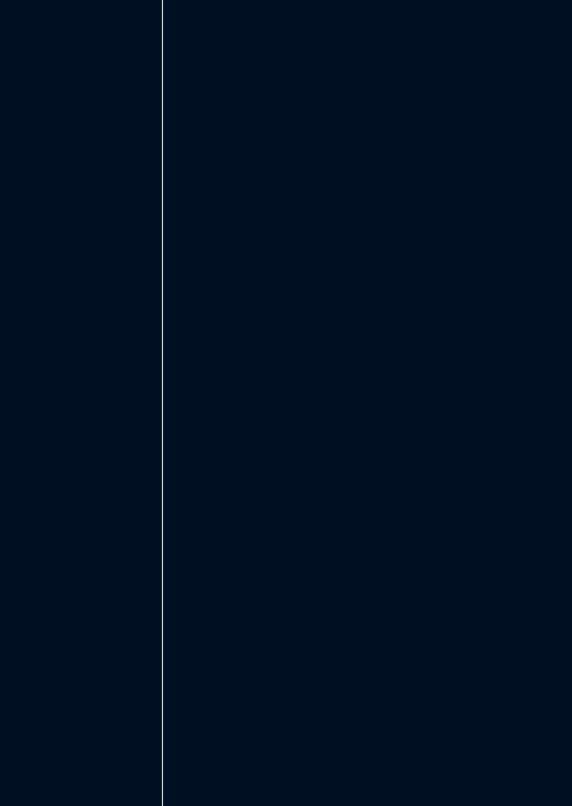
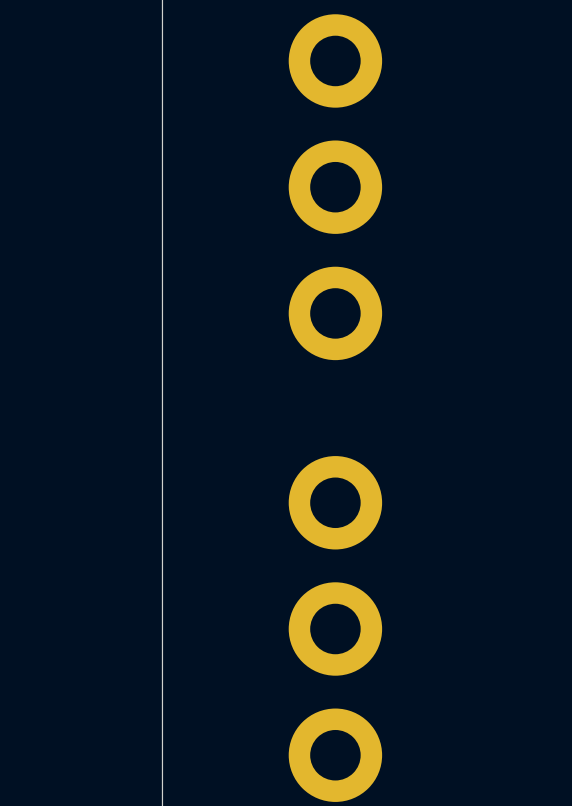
part: none -> (335, 187)
part: none -> (335, 629)

